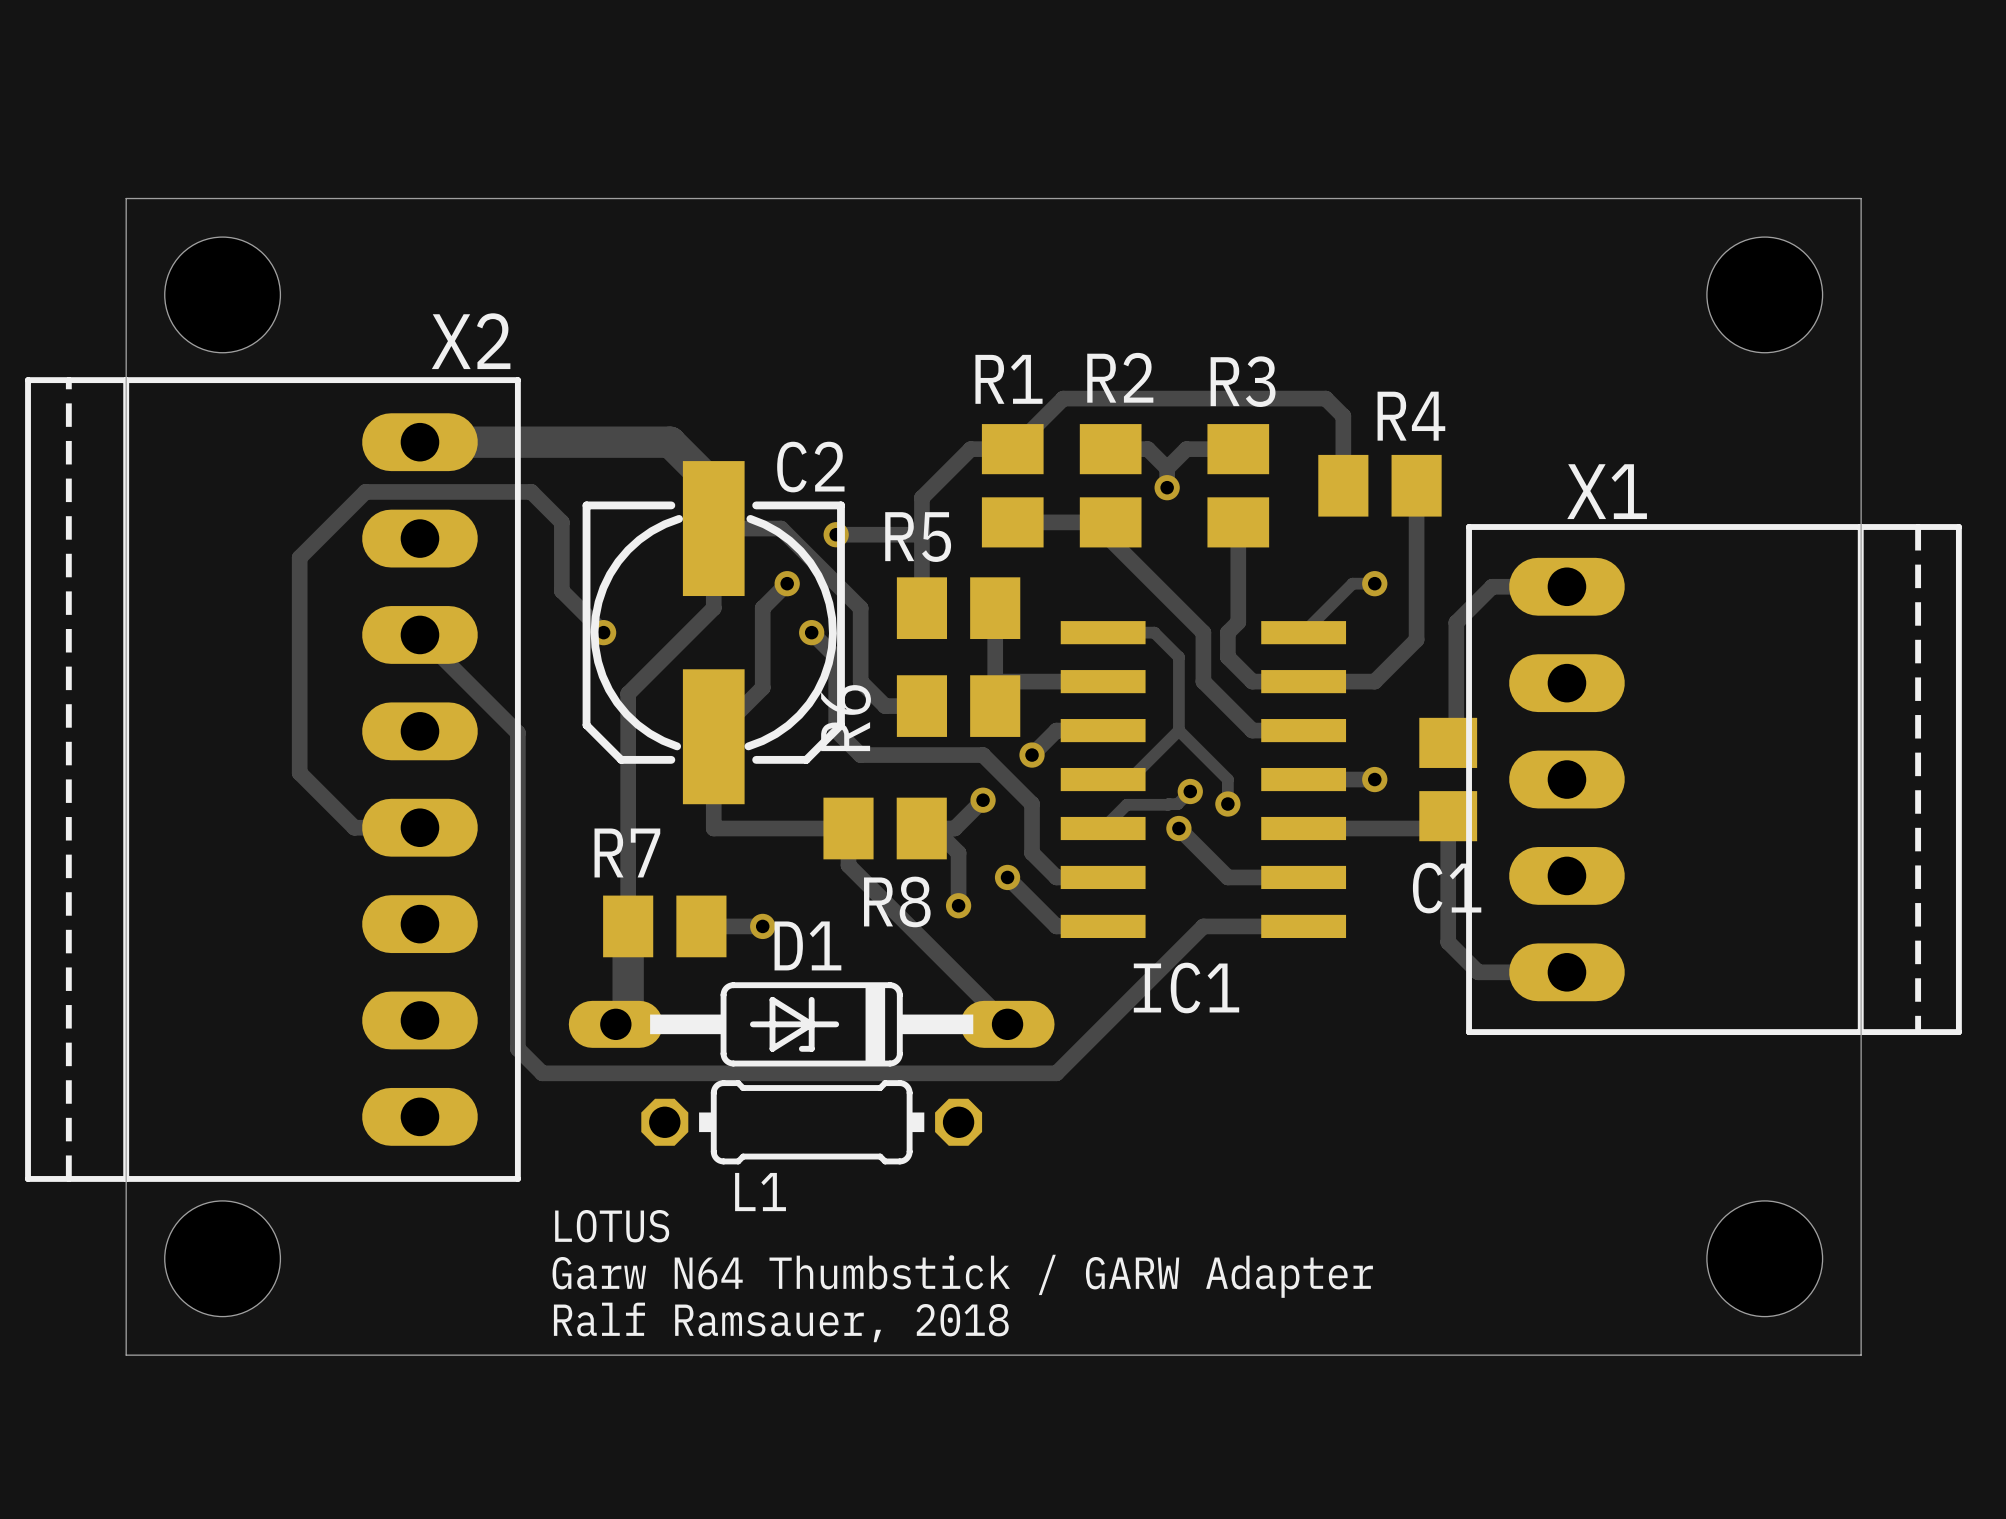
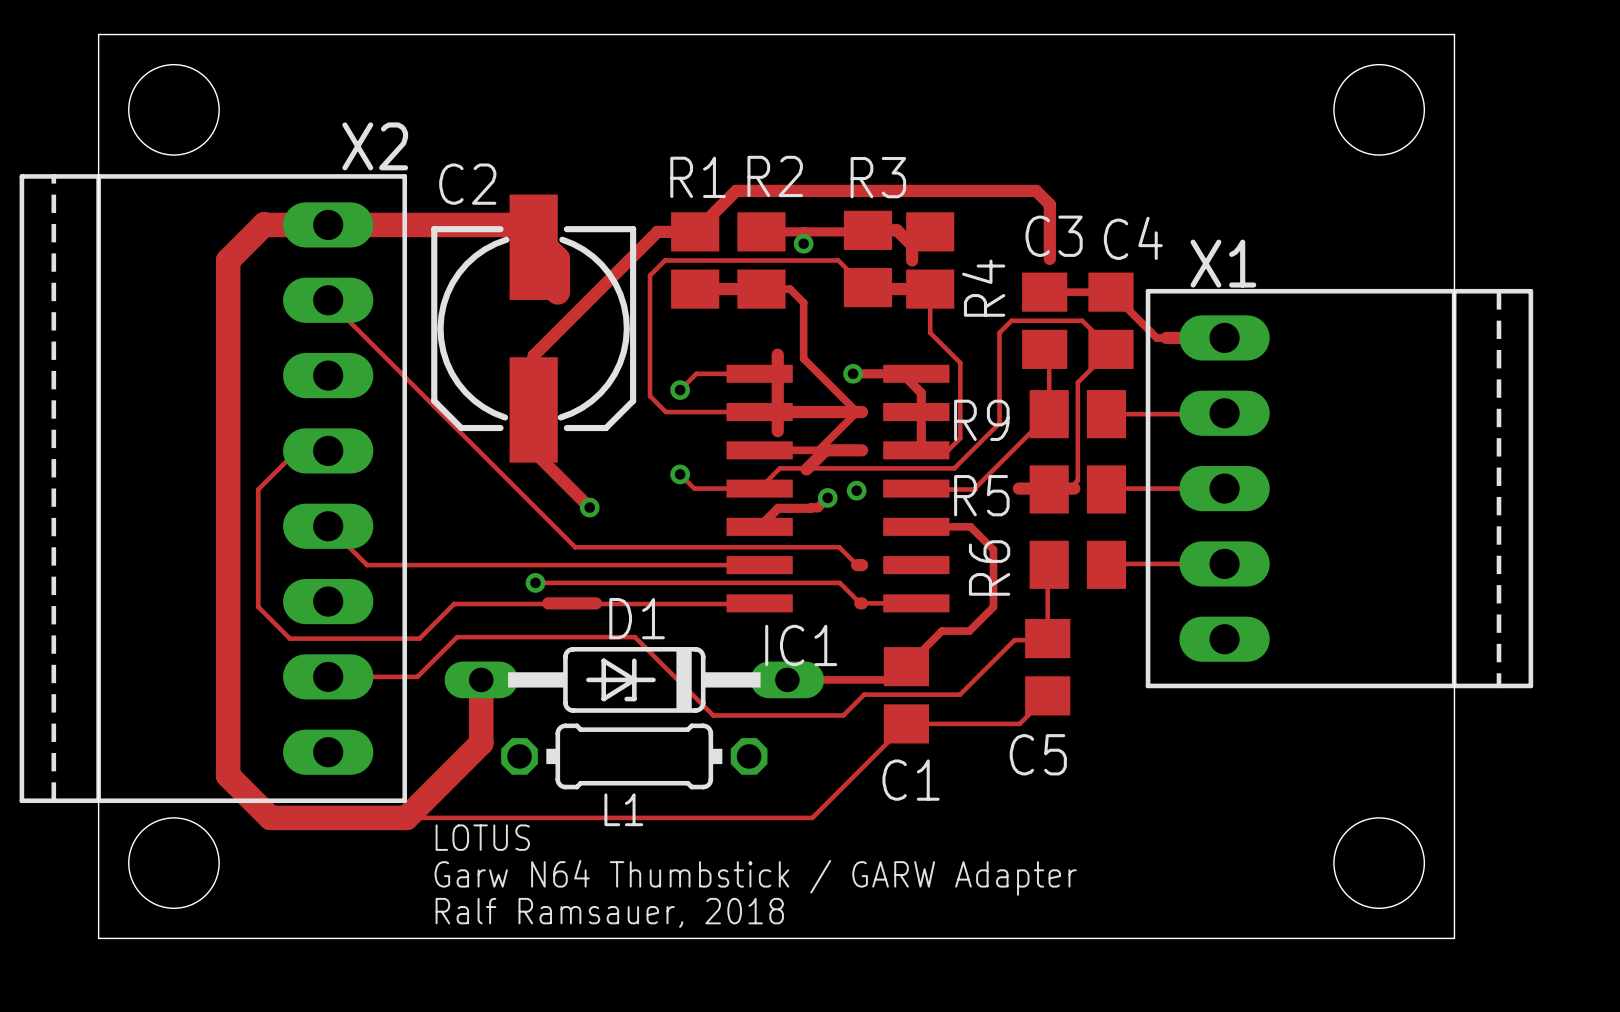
R2 name: R2 (1120, 377) -> R3 (878, 177)
track: (1063, 398) (1012, 449) (970, 449) (921, 497) (921, 608) -> (830, 190) (736, 190) (695, 231) (657, 231) (533, 355) (533, 451) (589, 507)
track: none -> (328, 224) (264, 224) (228, 260) (228, 775) (270, 817) (406, 817)
track: (1238, 449) (1186, 449) (1167, 468) -> none
track: none -> (761, 231) (865, 230) (866, 231)
via: none -> (803, 243)
C2 name position: C2 (810, 467) -> C2 (467, 184)
R1 position: (1012, 485) -> (695, 260)
R3: (1238, 485) -> none
R4 rotation: 0° (1379, 485) -> 90° clockwise (930, 260)
R4 position: (1379, 485) -> (930, 260)
track: (1416, 485) (1416, 639) (1374, 681) (1252, 681) (1227, 657) (1227, 632) (1238, 622) (1238, 522) -> none
R2: none -> (761, 260)
via: (1167, 487) -> none
X1 name position: X1 (1607, 491) -> X1 (1223, 263)
track: (1012, 522) (1110, 522) (1110, 539) (1203, 632) (1203, 681) (1252, 730) (1303, 730) -> none
track: none -> (695, 289) (790, 289) (803, 302) (803, 358) (856, 412) (818, 450) (759, 450)
track: (836, 534) (921, 534) -> none
via: (836, 534) -> none
R5 name position: R5 (918, 537) -> R5 (981, 495)
C3: none -> (1044, 320)
C4: none -> (1110, 320)
track: (787, 583) (762, 608) (762, 687) (713, 736) (713, 828) (848, 828) (848, 865) (1007, 1024) -> (916, 526) (970, 526) (993, 549) (993, 606) (969, 631) (941, 631) (893, 679) (787, 679)
via: (787, 583) -> none
track: (1374, 583) (1352, 583) (1303, 632) -> none
via: (1374, 583) -> none
track: (1492, 586) (1456, 622) (1456, 734) (1448, 742) -> (1166, 337) (1156, 337) (1110, 292) (1044, 292)
track: none -> (1044, 349) (1049, 353) (1049, 414) (975, 489) (912, 490)
R5 position: (958, 608) -> (1077, 489)
track: (603, 632) (561, 590) (561, 522) (531, 491) (365, 491) (299, 557) (299, 772) (354, 827) (419, 827) -> (759, 565) (367, 565) (328, 526)
via: (603, 632) -> none
C2 position: (713, 632) -> (533, 328)
track: (811, 632) (836, 657) (836, 730) (860, 755) (983, 755) (1032, 804) (1032, 852) (1056, 877) (1096, 877) -> (328, 300) (575, 547) (839, 547) (857, 565)
via: (811, 632) -> none
track: none -> (759, 373) (696, 373) (680, 390)
via: none -> (853, 373)
track: (419, 634) (517, 732) (517, 1048) (542, 1073) (1056, 1073) (1203, 926) (1303, 926) -> none
via: none -> (680, 390)
track: none -> (759, 412) (665, 412) (649, 396) (649, 275) (665, 260) (838, 260) (866, 289) (930, 289) (930, 332) (960, 362) (960, 438) (948, 450) (916, 450)
track: none -> (1224, 413) (1106, 414)
R9: none -> (1077, 414)
track: (921, 706) (885, 706) (860, 681) (860, 608) (781, 528) (713, 528) (713, 608) (628, 693) (628, 1012) (615, 1024) -> (406, 817) (481, 743) (481, 679)
R6 position: (958, 706) -> (1077, 564)
track: none -> (328, 450) (296, 450) (258, 489) (258, 606) (289, 638) (419, 638) (454, 603) (759, 603)
via: (1032, 755) -> none
track: none -> (680, 474) (694, 488) (759, 488) (779, 468) (954, 468) (999, 423) (999, 332) (1011, 320) (1082, 320) (1110, 349) (1077, 382) (1077, 480) (1068, 489) (1049, 489)
via: none -> (680, 474)
track: (1103, 779) (1129, 779) (1178, 730) (1227, 779) (1227, 804) -> none
IC1 position: (1203, 779) -> (838, 488)
via: (1374, 779) -> none
C1 position: (1448, 779) -> (906, 695)
track: none -> (1224, 488) (1106, 489)
via: none -> (856, 490)
via: none -> (827, 497)
track: (1190, 791) (1177, 804) (1126, 804) (1103, 828) -> (827, 497) (817, 507) (778, 508) (759, 526)
via: (1190, 791) -> none
track: (983, 800) (954, 828) (921, 828) -> none
via: (983, 800) -> none
via: none -> (589, 507)
via: (1227, 804) -> none
R8: (885, 828) -> none
track: (934, 828) (958, 852) (958, 905) -> none
track: (1178, 828) (1227, 877) (1303, 877) -> none
via: (1178, 828) -> none
track: (1303, 828) (1435, 828) (1448, 816) (1448, 942) (1478, 972) (1566, 972) -> none
track: none -> (1224, 563) (1106, 564)
track: (1007, 877) (1056, 926) (1100, 926) -> none
via: (1007, 877) -> none
track: none -> (1049, 564) (1046, 640) (1014, 640) (960, 694) (864, 694) (843, 715) (713, 715) (634, 637) (457, 637) (417, 676) (328, 676)
track: none -> (535, 582) (839, 582) (860, 603) (916, 603)
via: none -> (535, 582)
via: (958, 905) -> none
R7: (664, 926) -> none
via: (762, 926) -> none
IC1 name position: IC1 (1186, 988) -> IC1 (801, 645)
C5: none -> (1047, 667)
track: none -> (1047, 695) (1019, 723) (906, 723) (812, 817) (406, 817)
L1 name position: L1 (760, 1192) -> L1 (623, 809)

